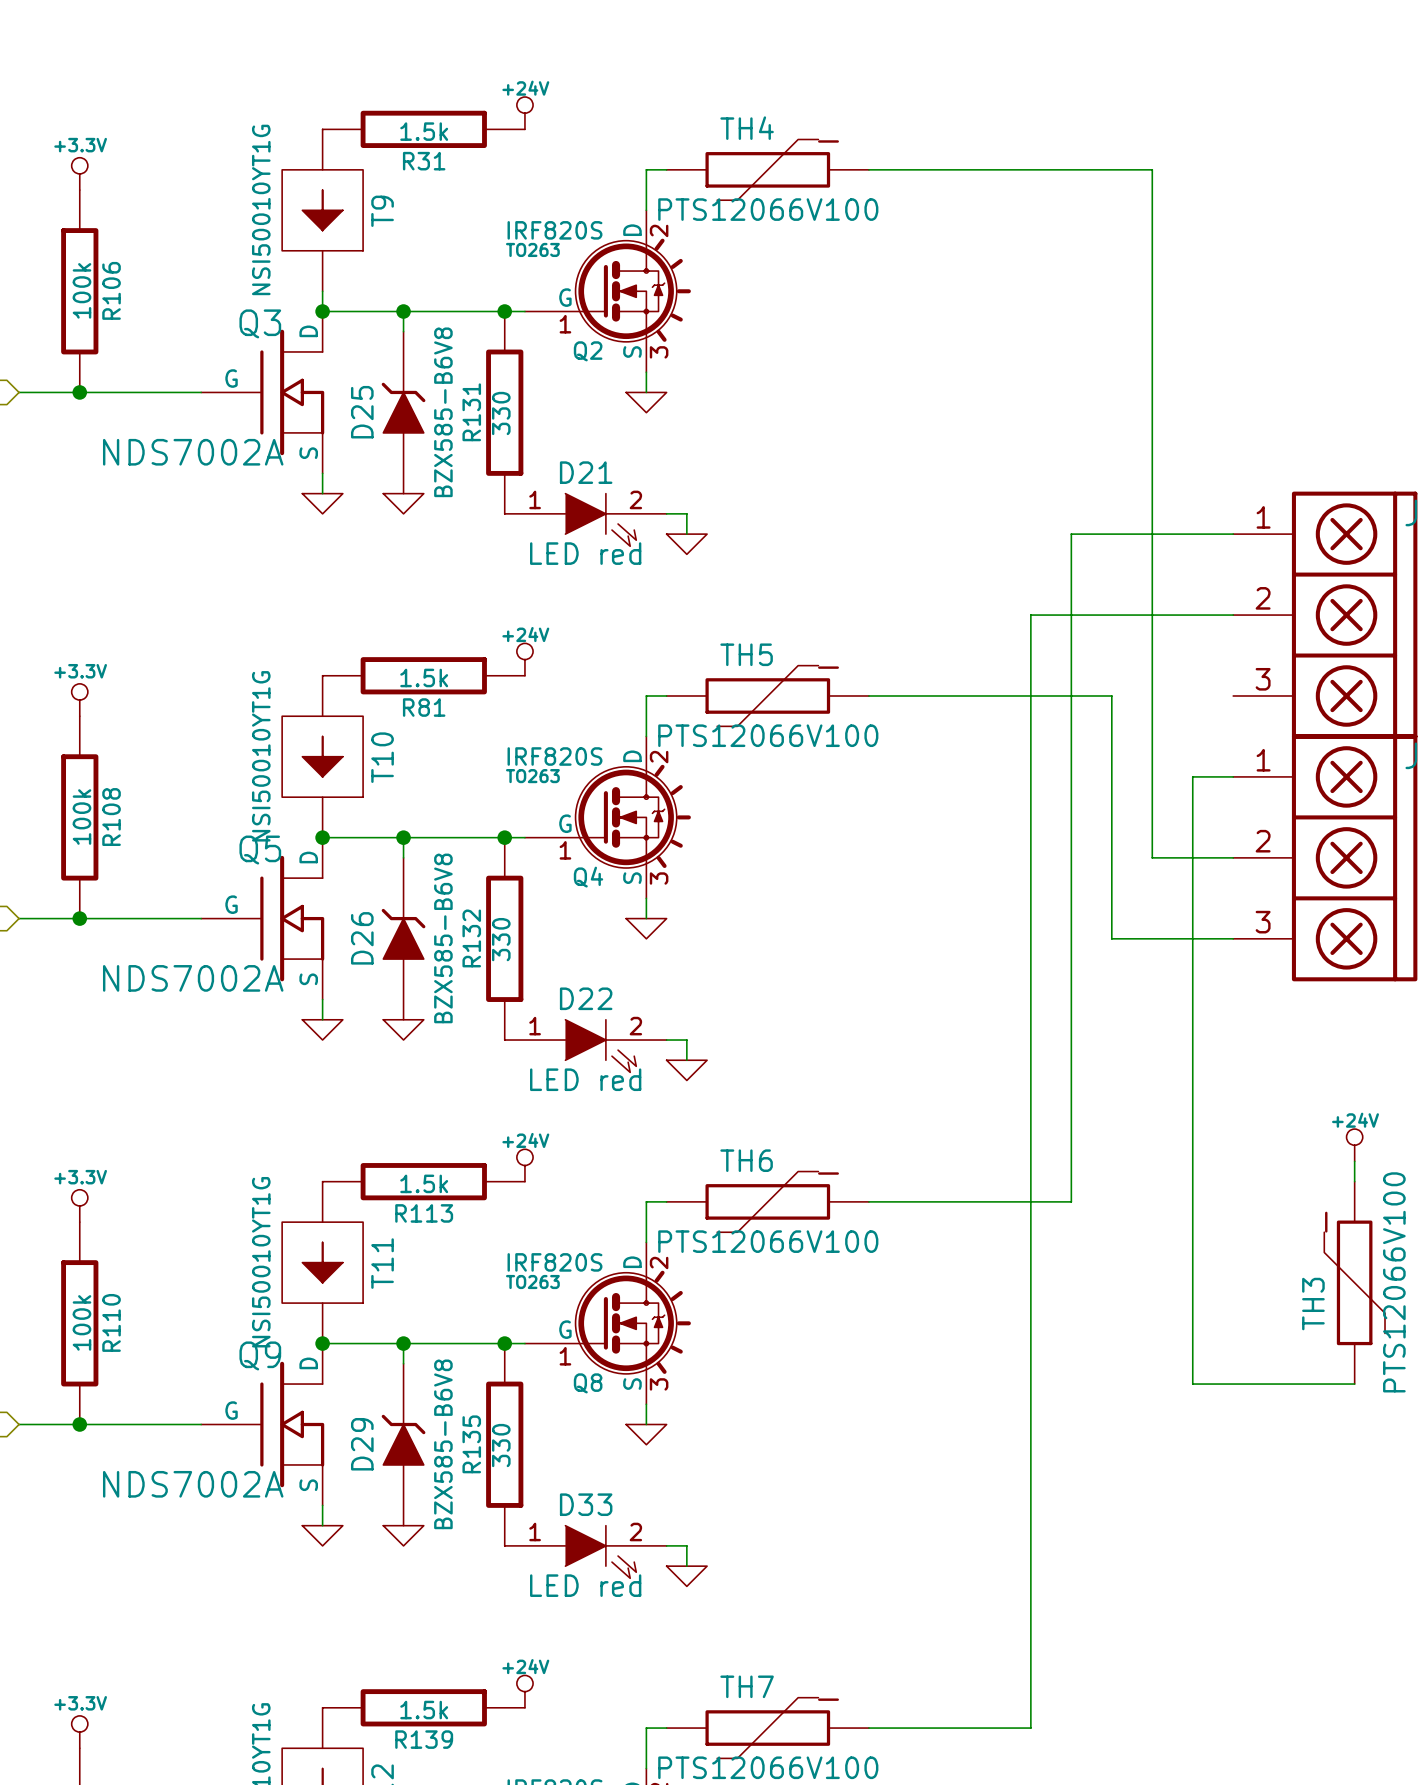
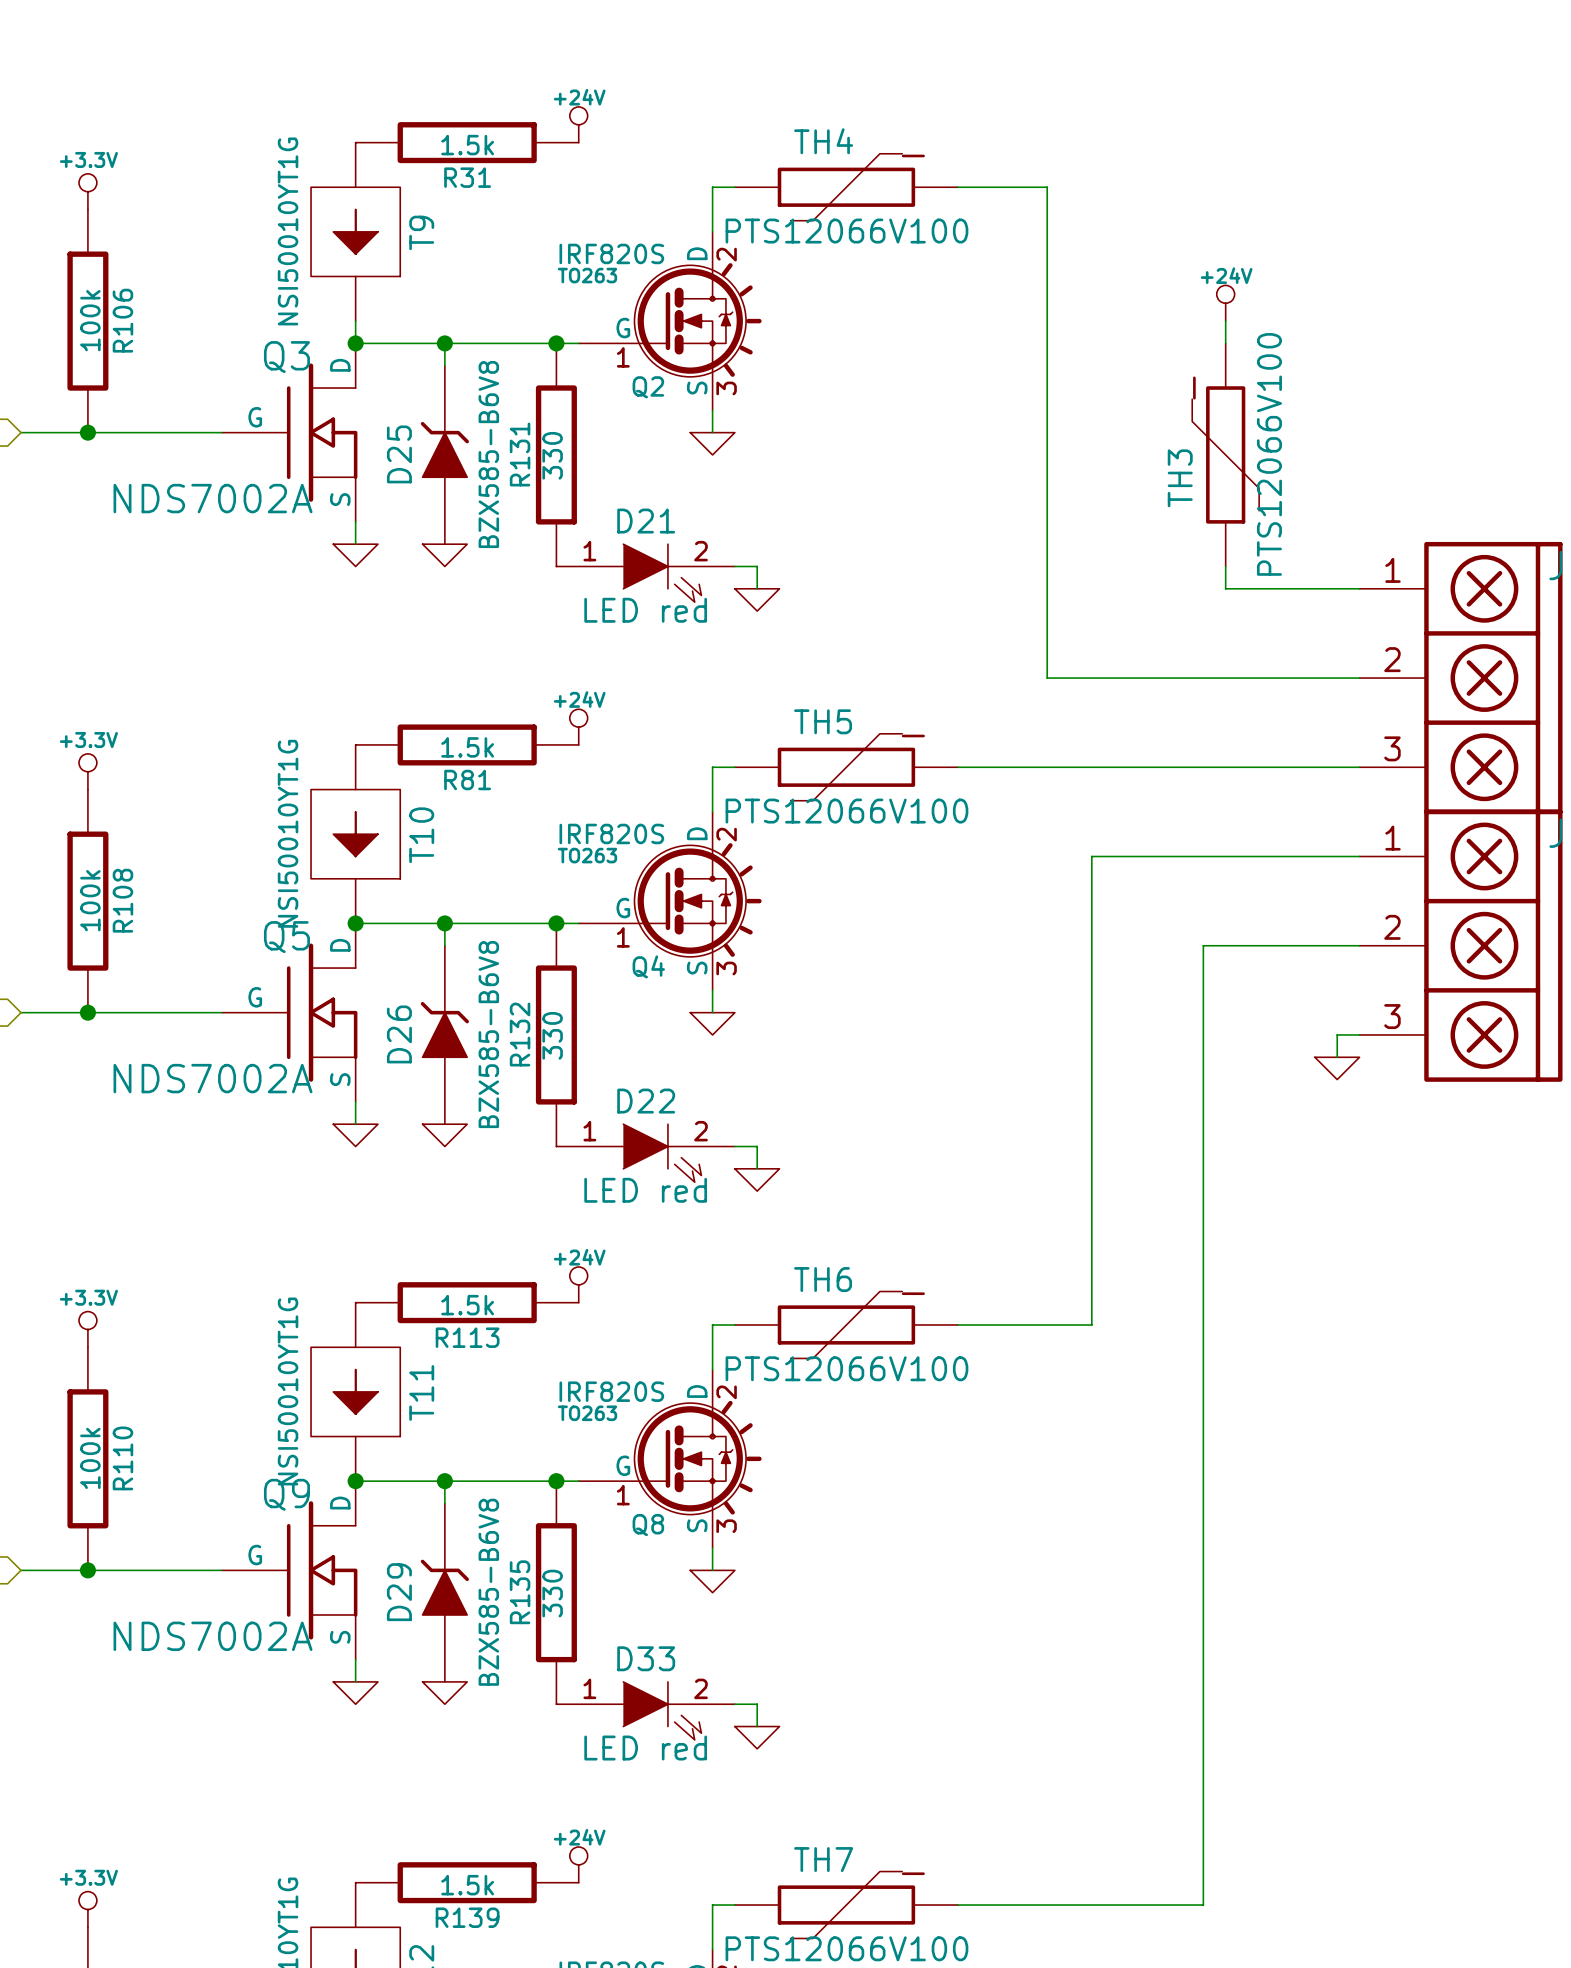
wire: (949, 169) (1152, 169) (1152, 857) -> (1047, 187) (1047, 678) (1136, 678)
power symbol: none -> +24V (1225, 303)
wire: none -> (1225, 321) (1225, 343)
wire: none -> (1225, 566) (1225, 588)
wire: (1111, 534) (1071, 534) (1071, 1201) (990, 1201) -> (1314, 856) (1091, 856) (1091, 1324)
wire: (1030, 615) (1030, 1728) -> (1270, 945) (1203, 945) (1203, 1905) (1136, 1905)
wire: (1111, 695) (1111, 938) (1212, 938) -> (1225, 767) (1359, 767)
wire: (1192, 776) (1192, 1384) (1354, 1384) -> none
power symbol: none -> (1337, 1068)
power symbol: +24V (1354, 1145) -> none
wire: (1354, 1161) (1354, 1181) -> (1337, 1034) (1337, 1057)
TH3 position: (1354, 1282) -> (1225, 454)

